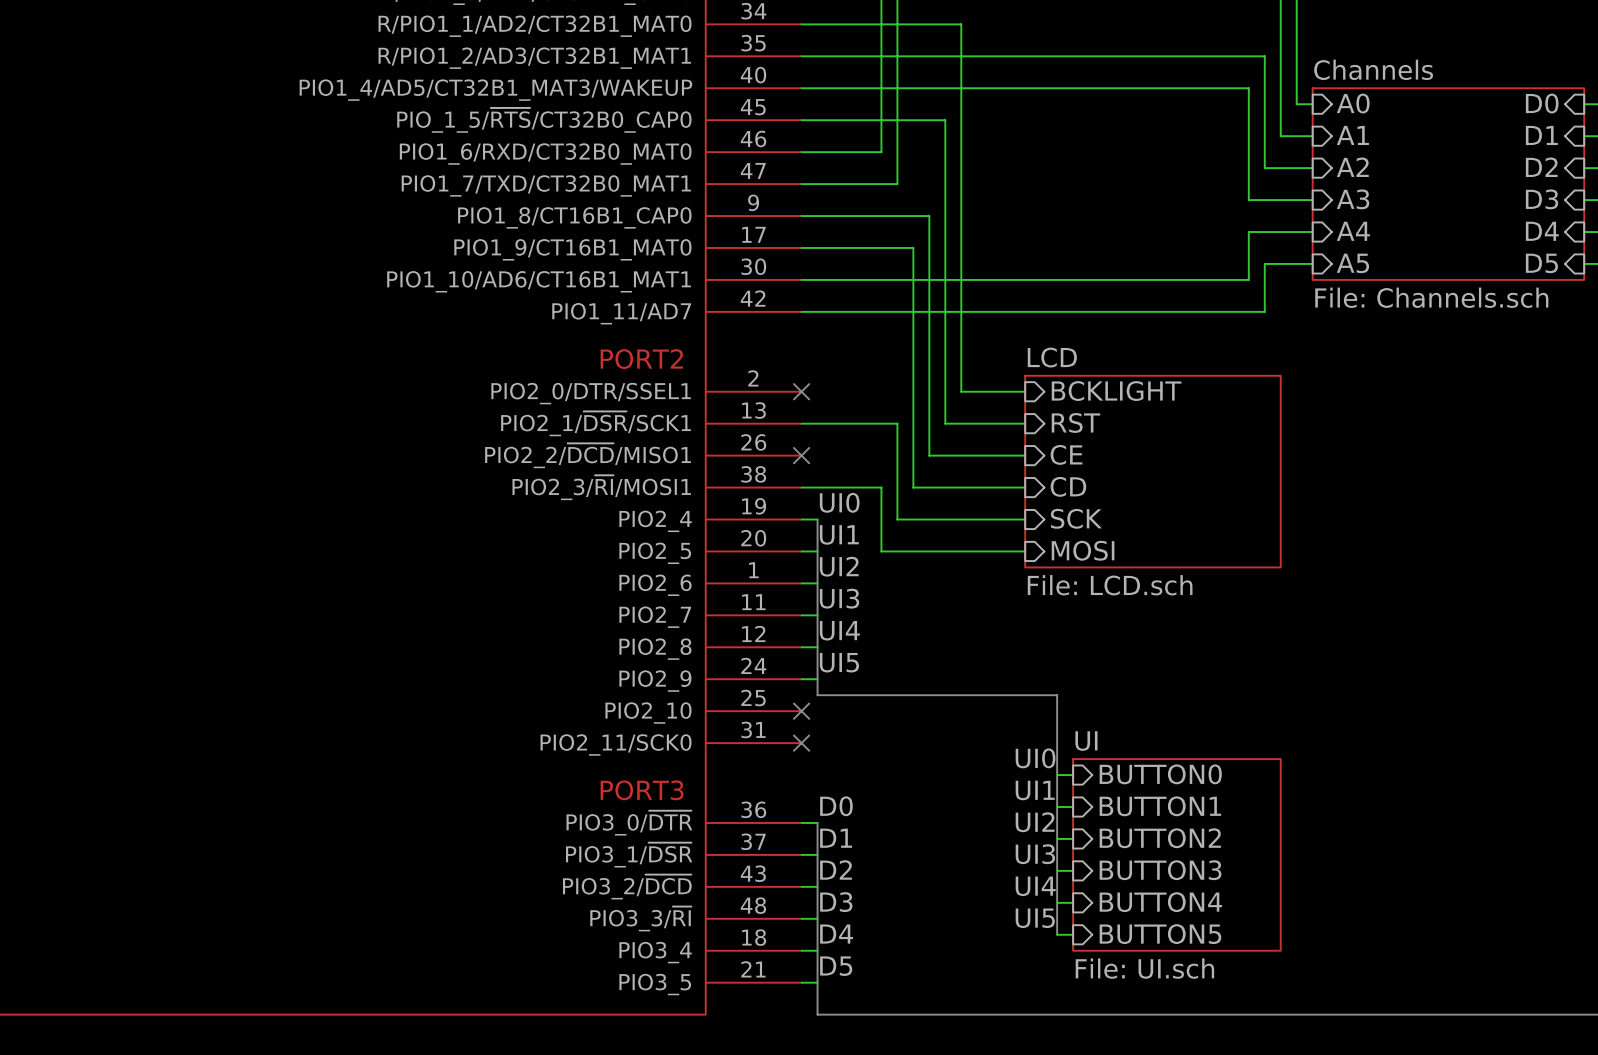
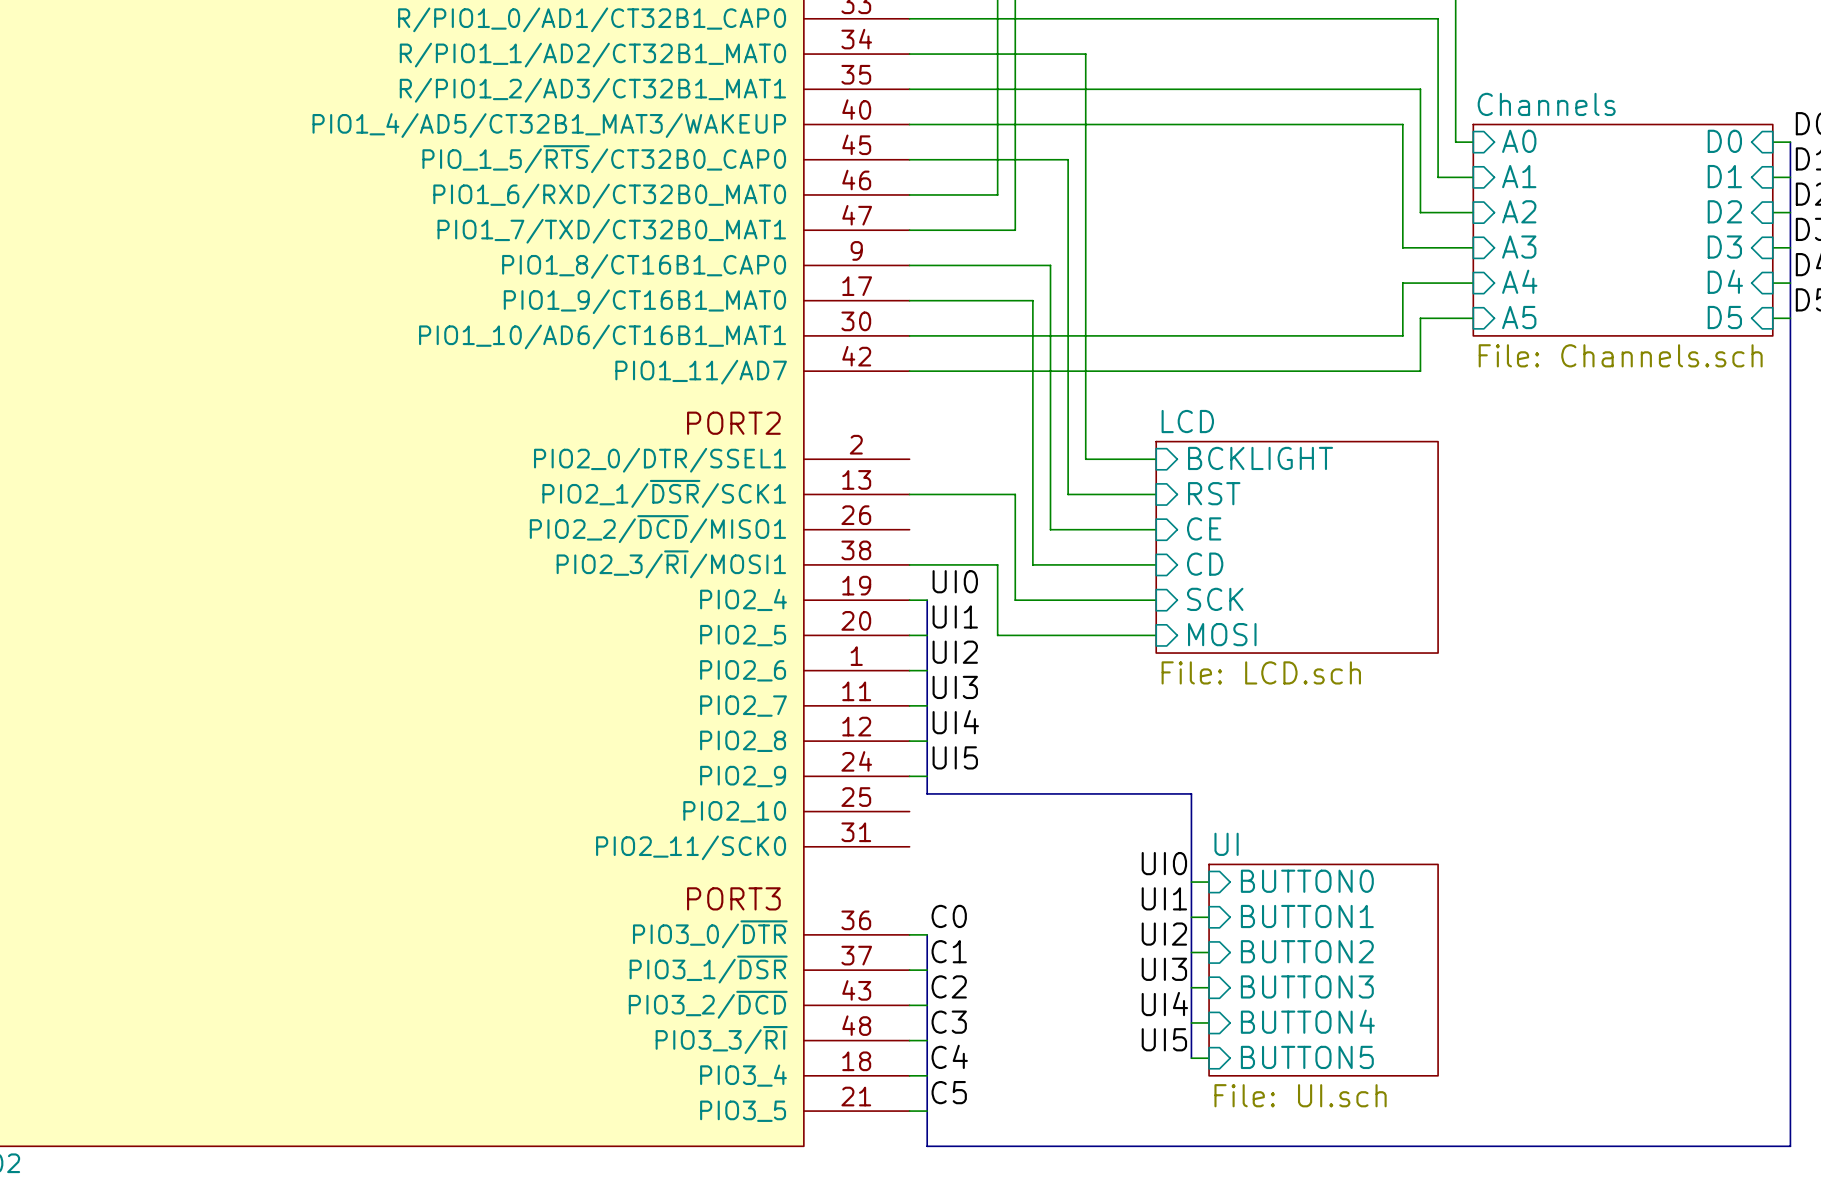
no-connect mark: (801, 391) -> none
no-connect mark: (801, 455) -> none
no-connect mark: (801, 711) -> none
no-connect mark: (801, 743) -> none
label: D0 (836, 806) -> C0 (949, 916)
label: D1 (836, 838) -> C1 (949, 951)
label: D2 (836, 869) -> C2 (949, 986)
label: D3 (836, 902) -> C3 (949, 1022)
label: D4 (836, 934) -> C4 (949, 1056)
label: D5 (836, 966) -> C5 (949, 1092)

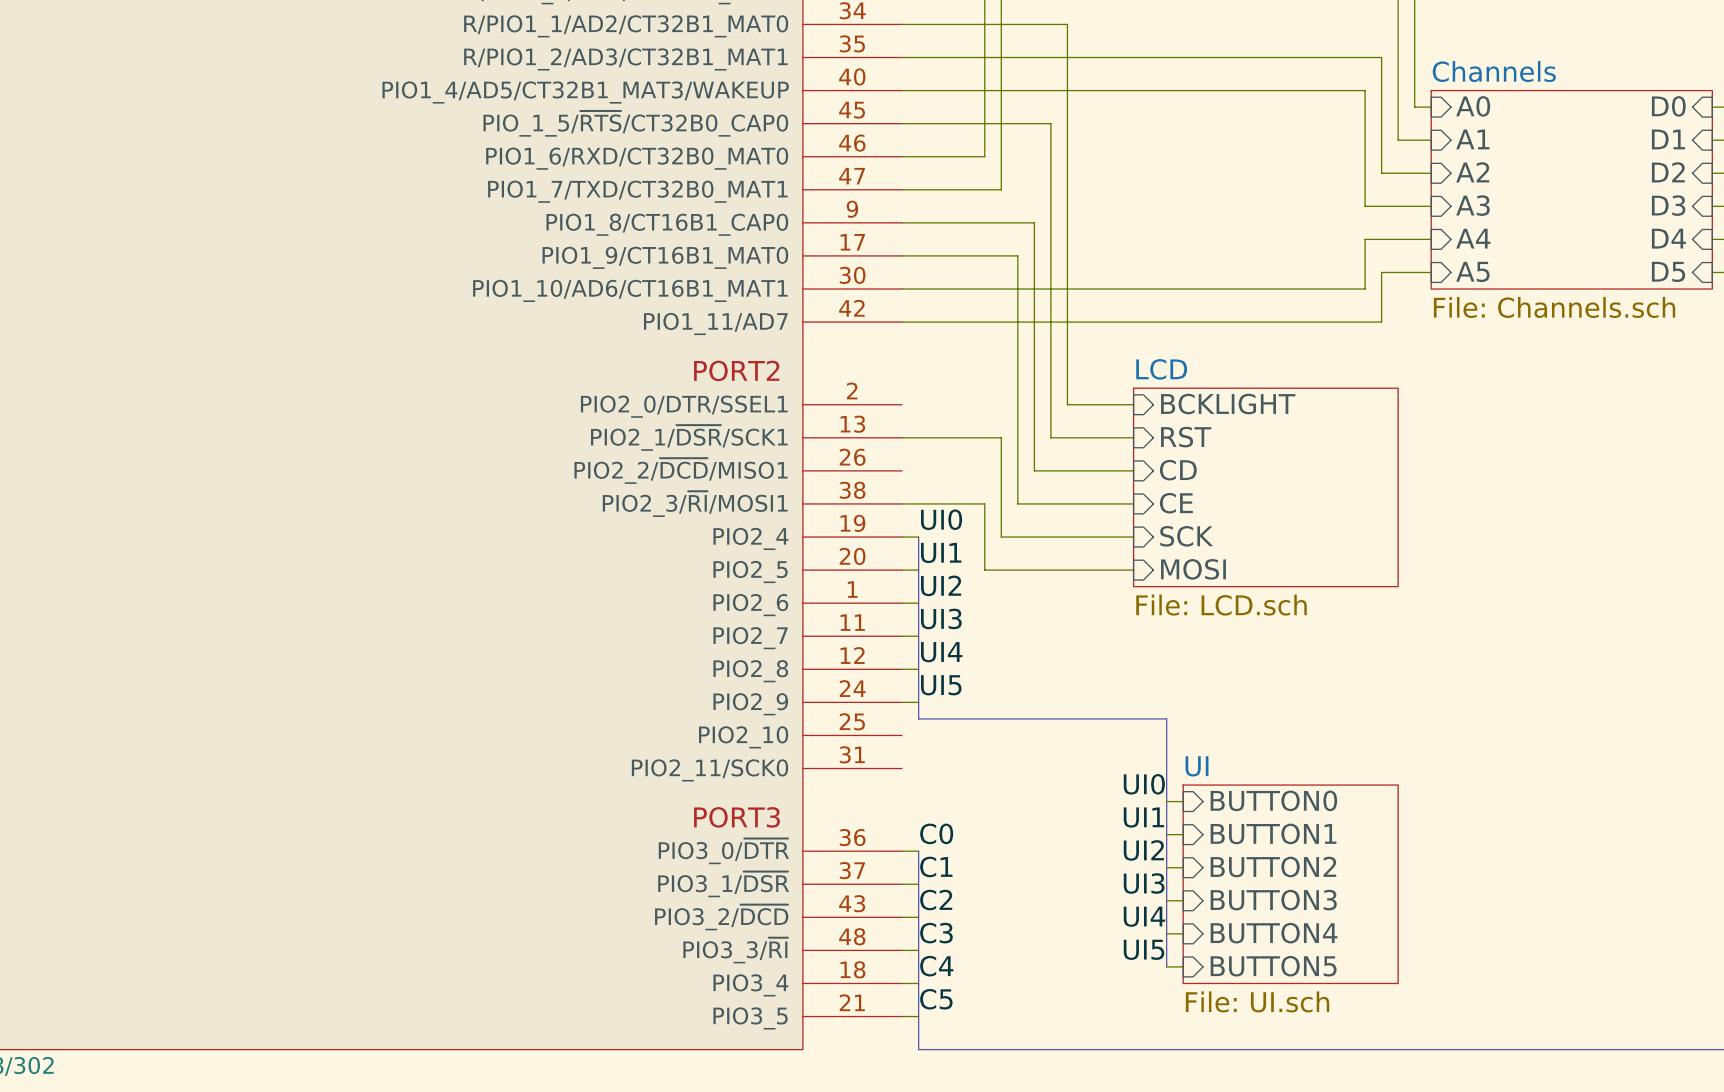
sheet pin: CE (1204, 528) -> CD (1178, 470)
sheet pin: CD (1205, 564) -> CE (1176, 503)

